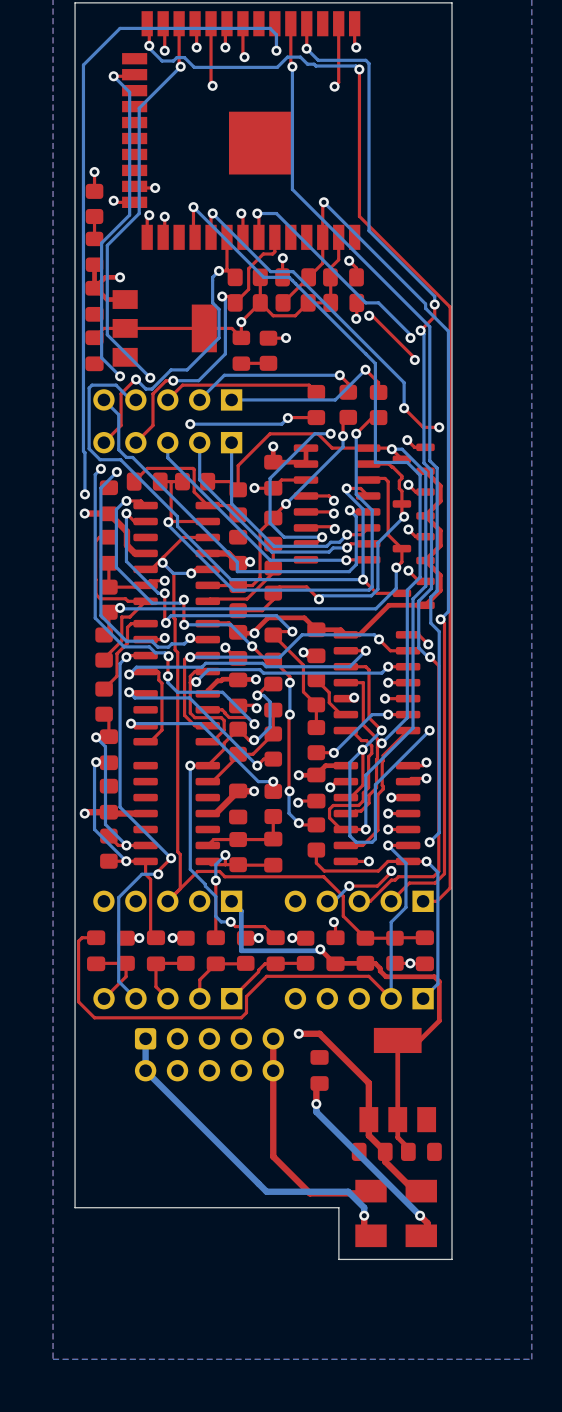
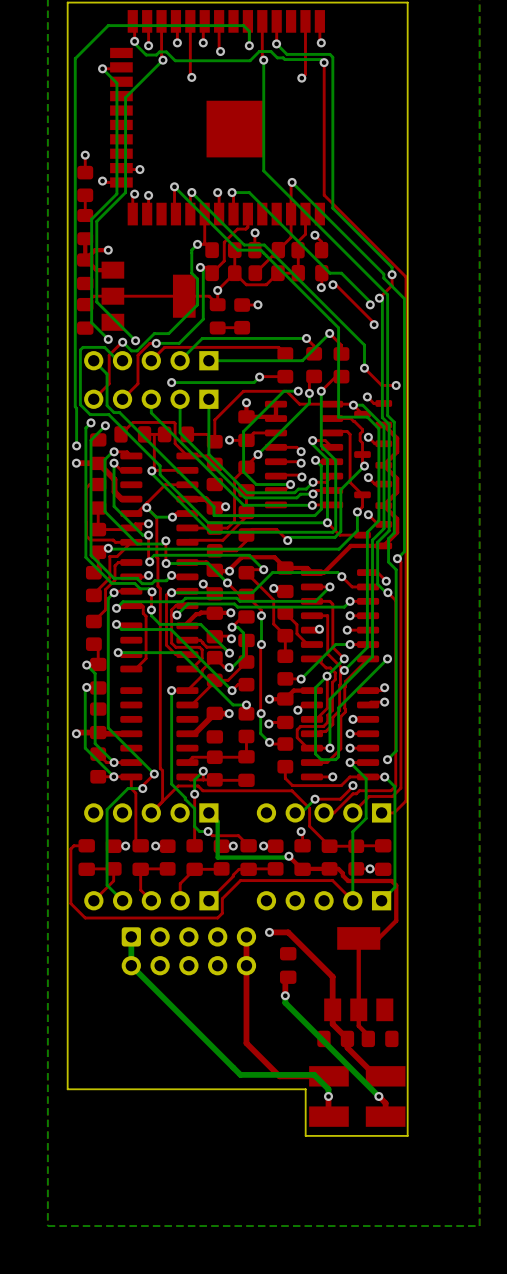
part footprint: [355, 1179, 437, 1203] -> [309, 1066, 406, 1087]
part footprint: [355, 1224, 437, 1248] -> [309, 1106, 406, 1127]

